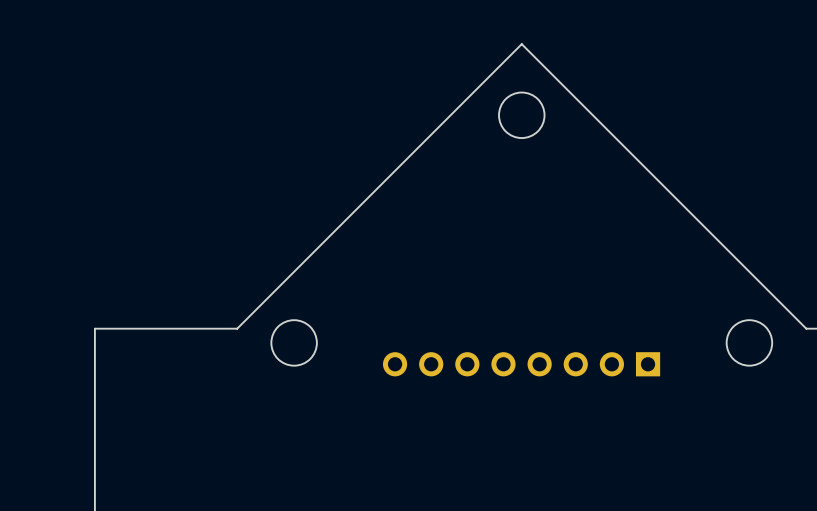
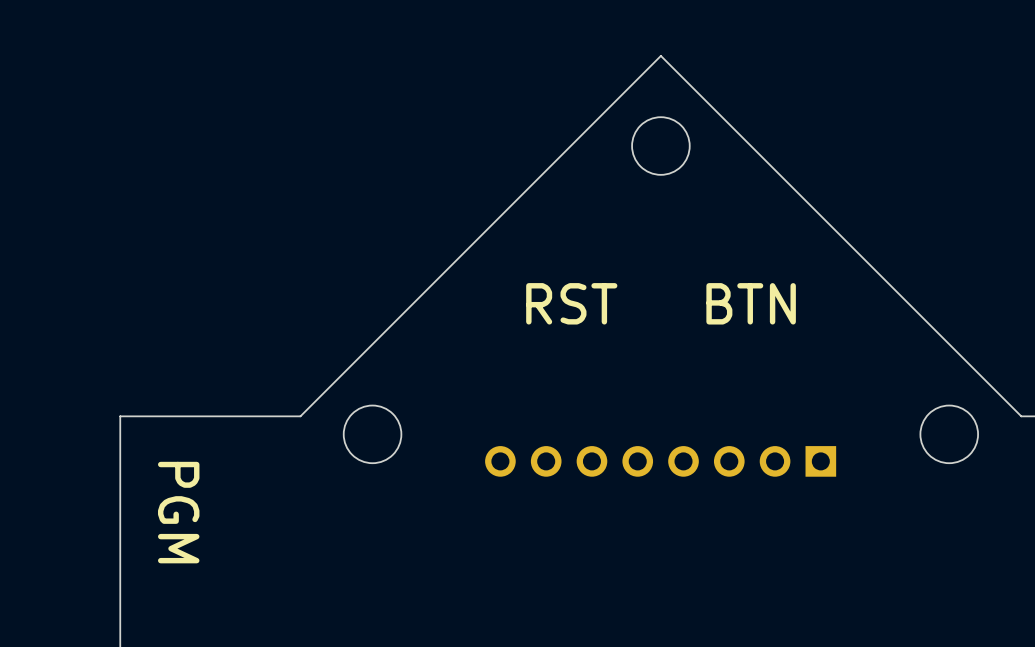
text: none -> RST (571, 303)
text: none -> BTN (751, 303)
text: none -> PGM (178, 512)

